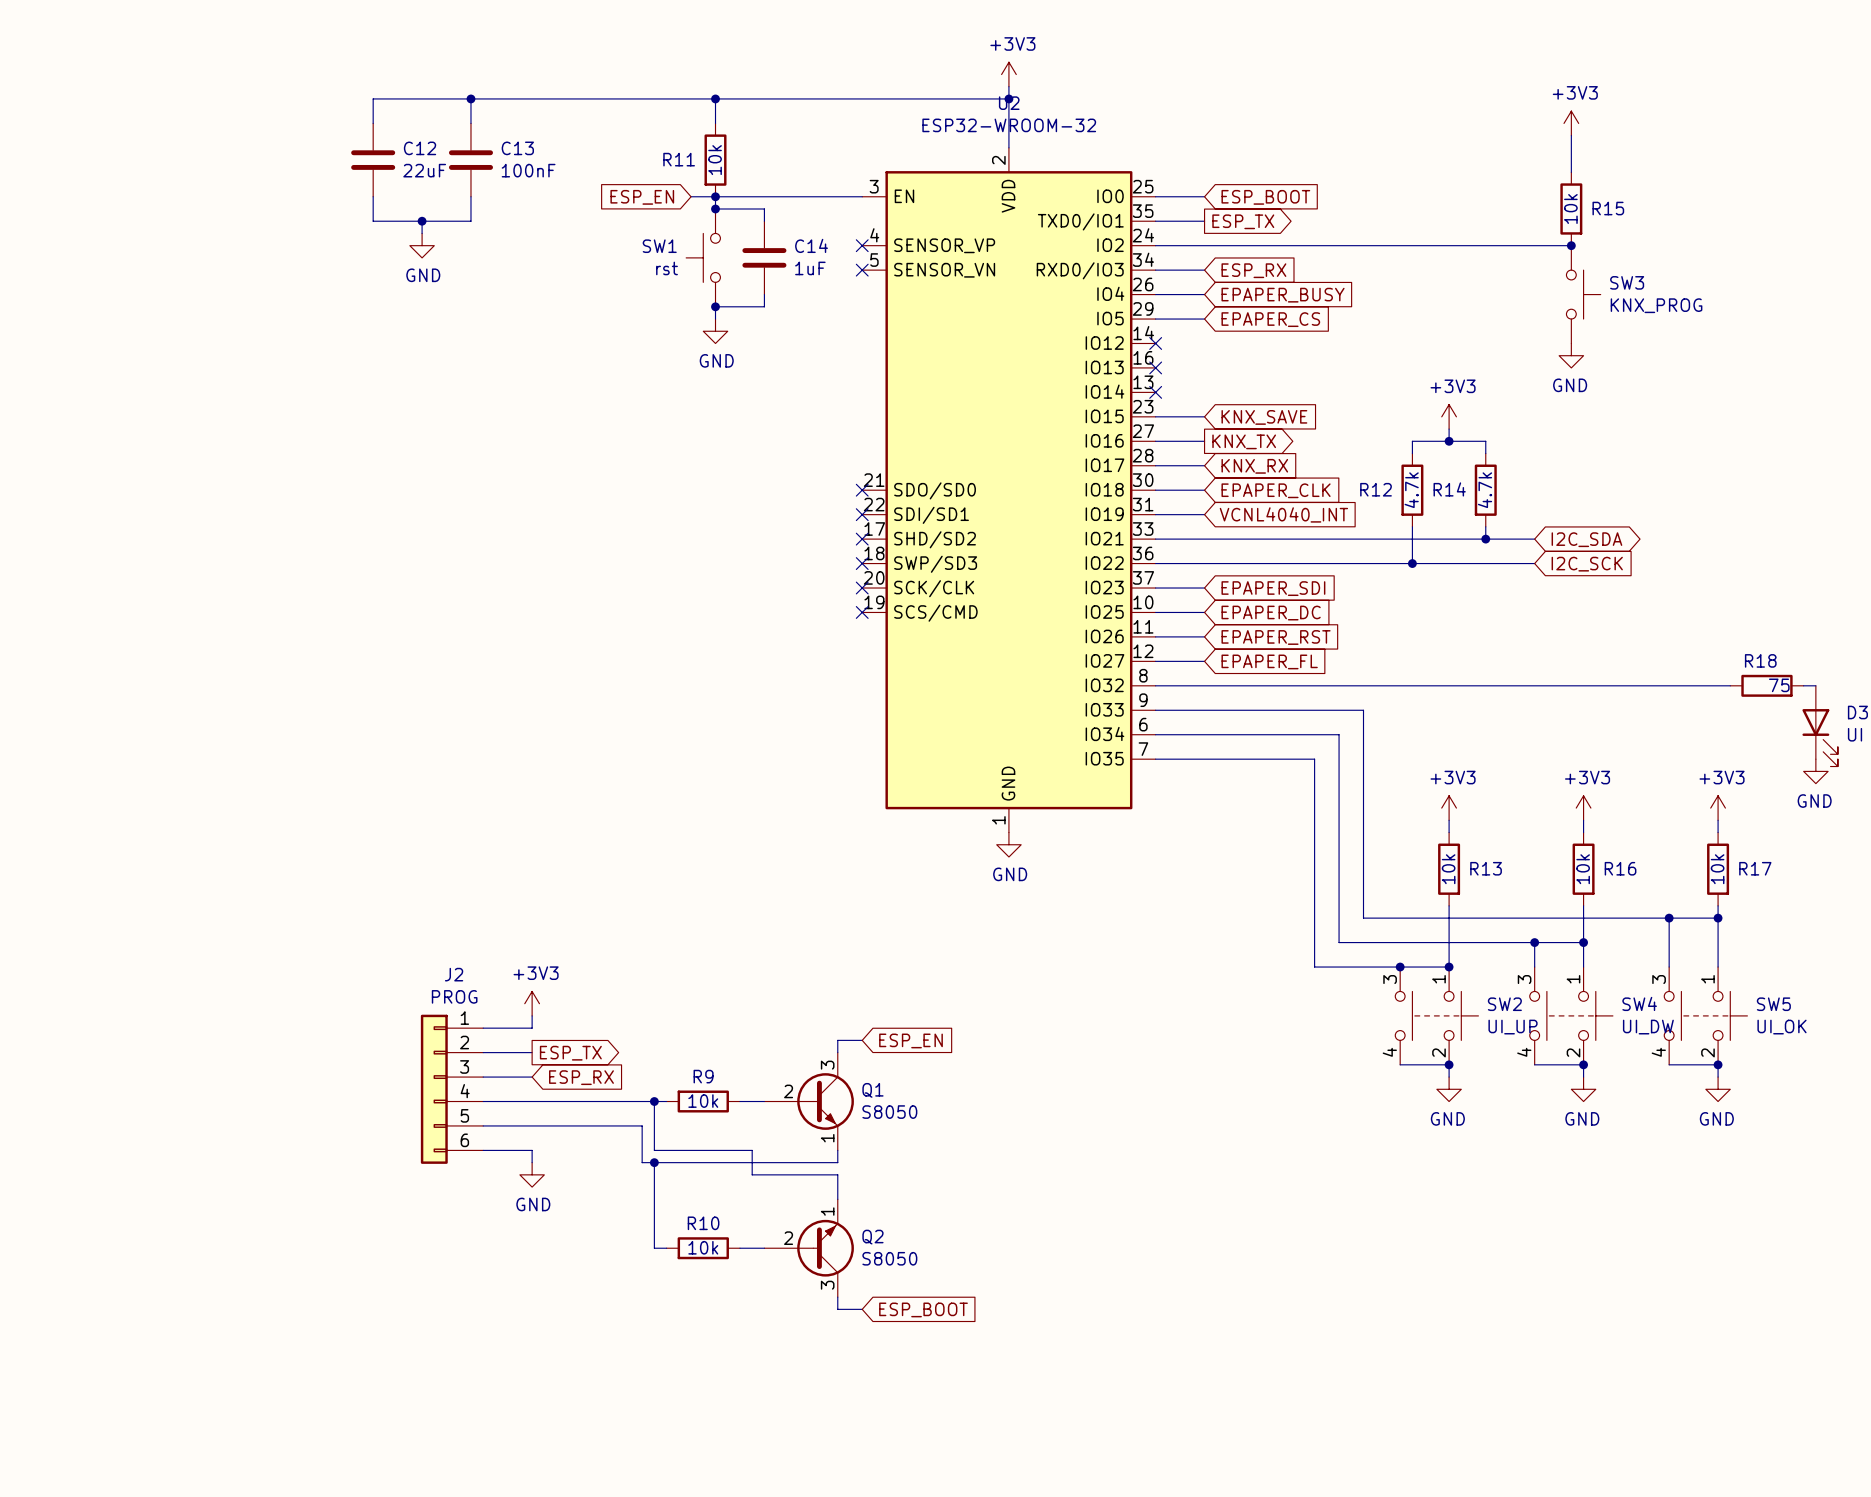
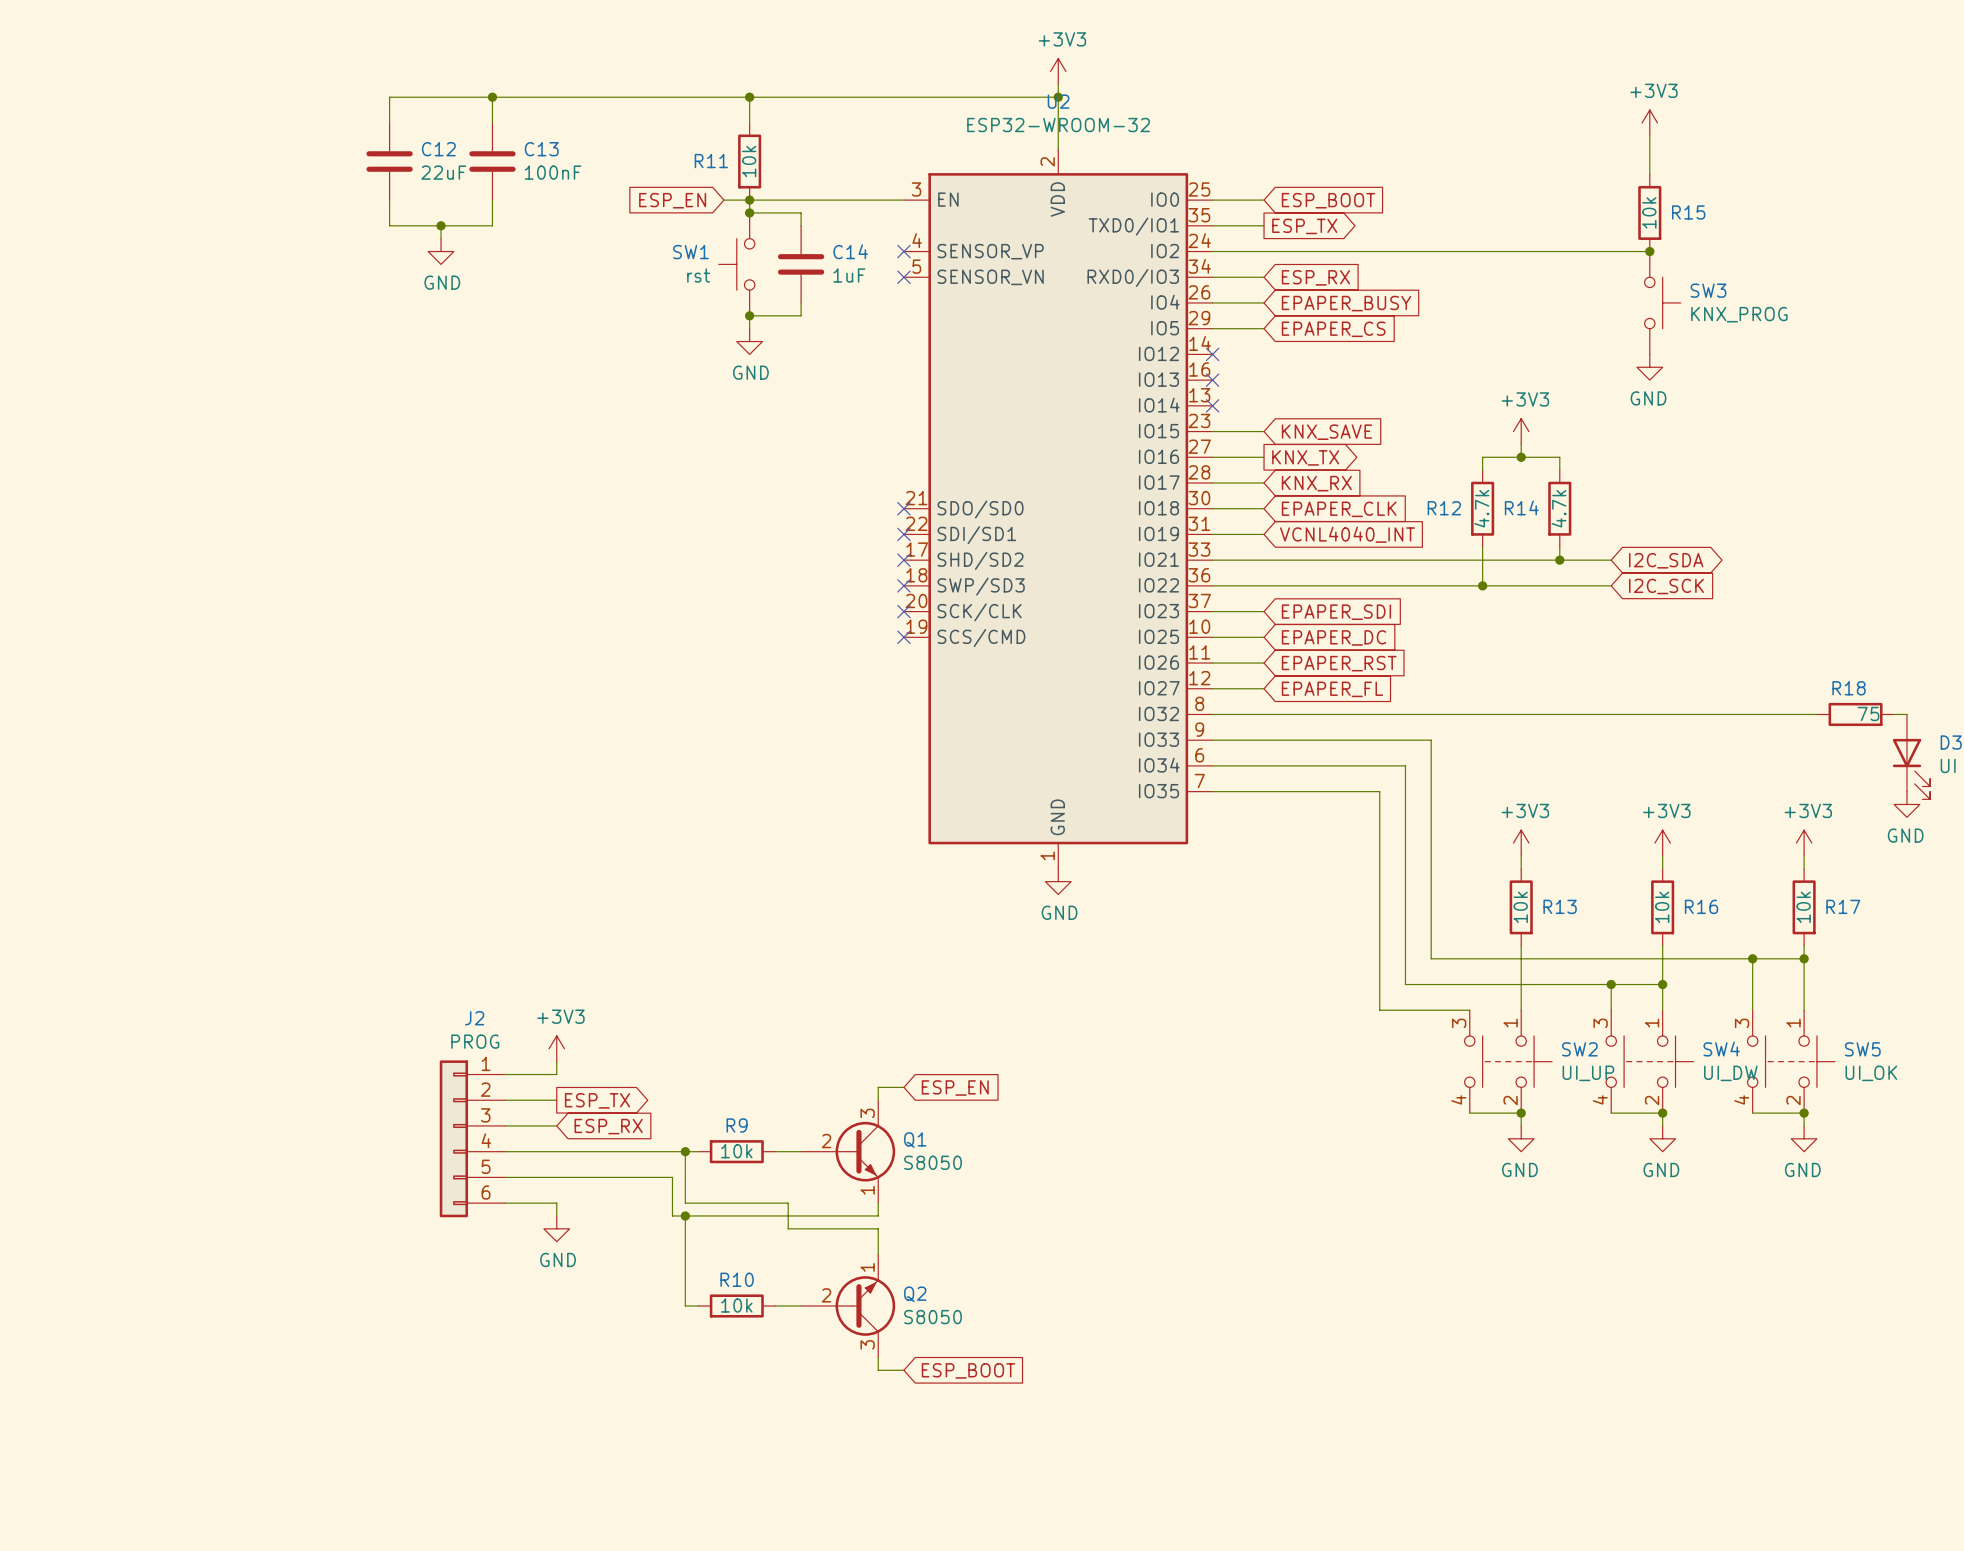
wire: (1400, 967) (1449, 967) -> none
junction: (1400, 967) -> none
junction: (1449, 967) -> none

